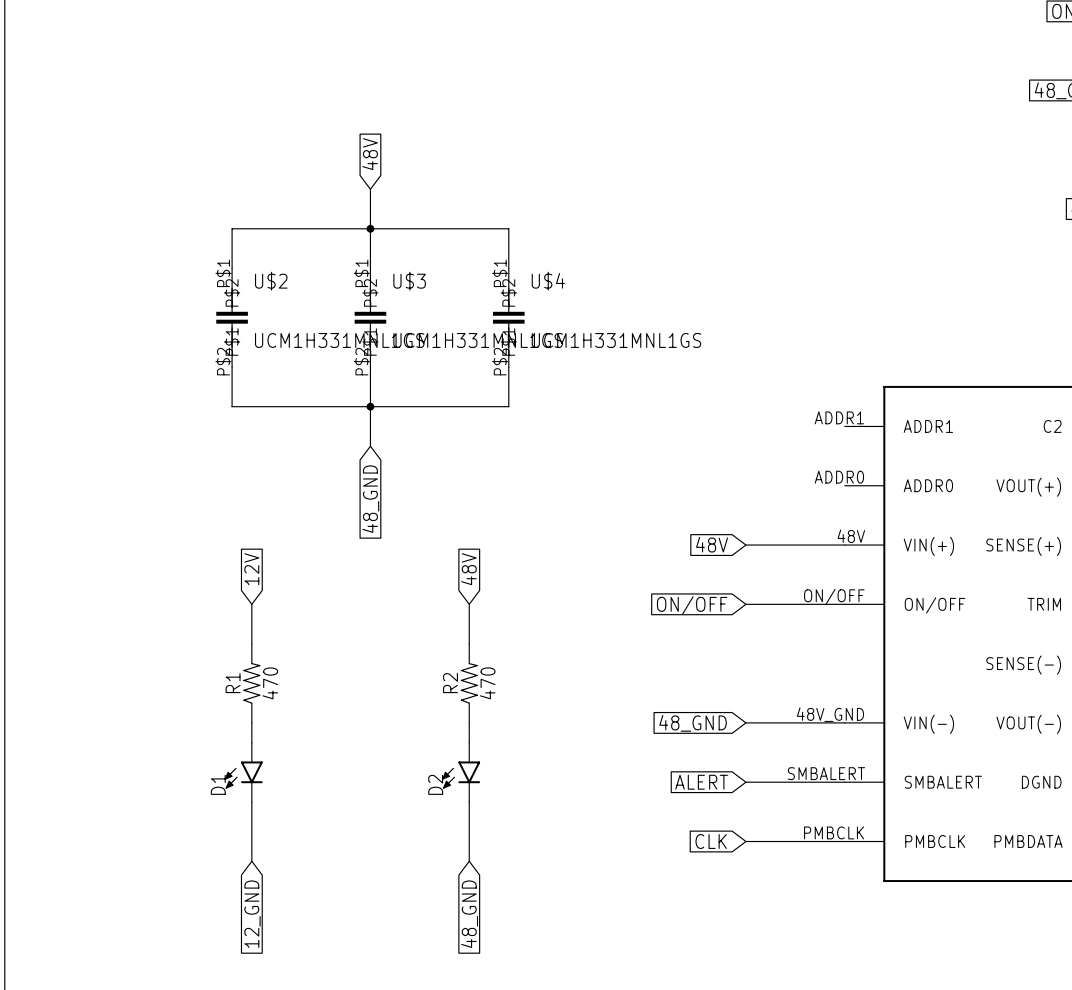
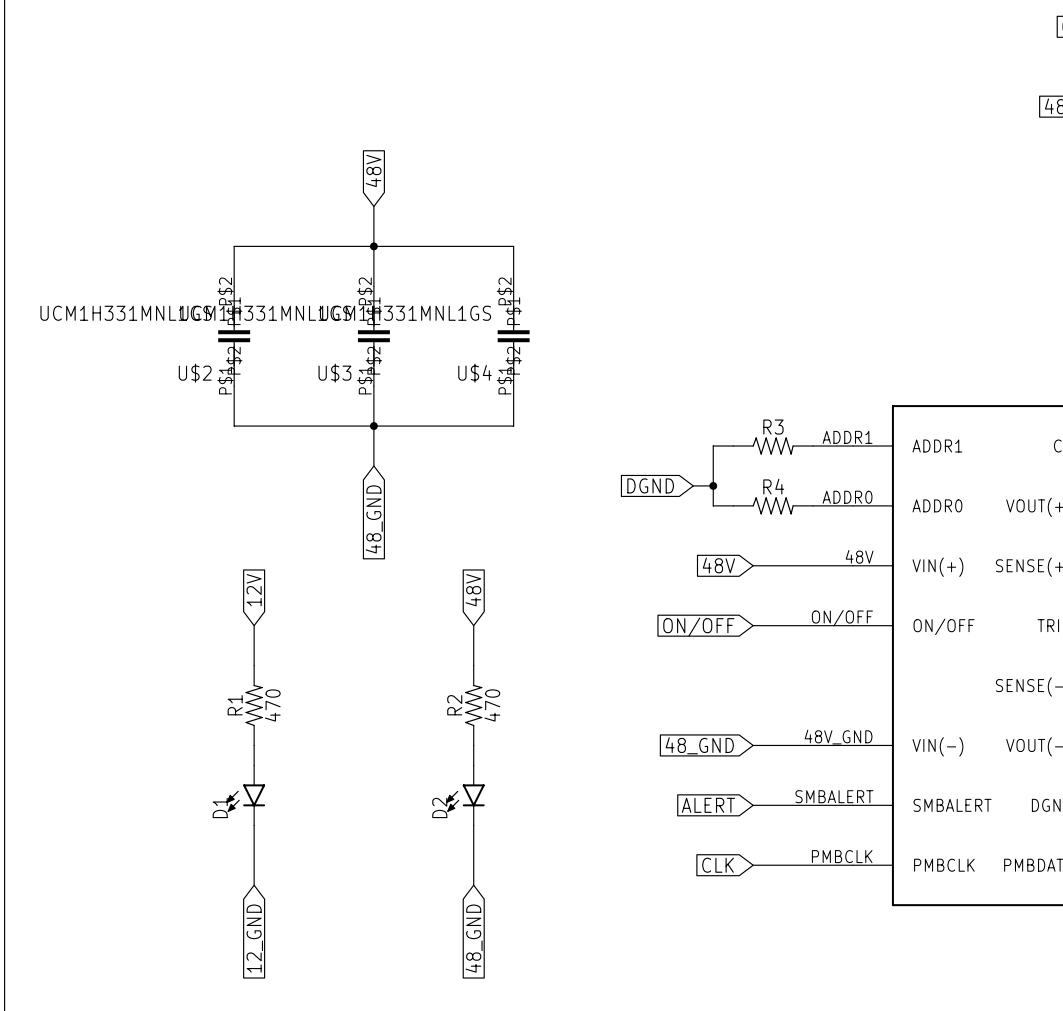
U$2 rotation: 0° (232, 317) -> 180° (234, 336)
U$3 rotation: 0° (370, 317) -> 180° (373, 336)
U$4 rotation: 0° (508, 317) -> 180° (513, 336)
wire: none -> (733, 446) (713, 446) (713, 505) (733, 505)
R3: none -> (773, 446)
wire: none -> (813, 446) (853, 446)
global label: none -> DGND (650, 485)
wire: none -> (693, 485) (713, 485)
junction: none -> (713, 485)
R4: none -> (773, 505)
wire: none -> (813, 505) (853, 505)

